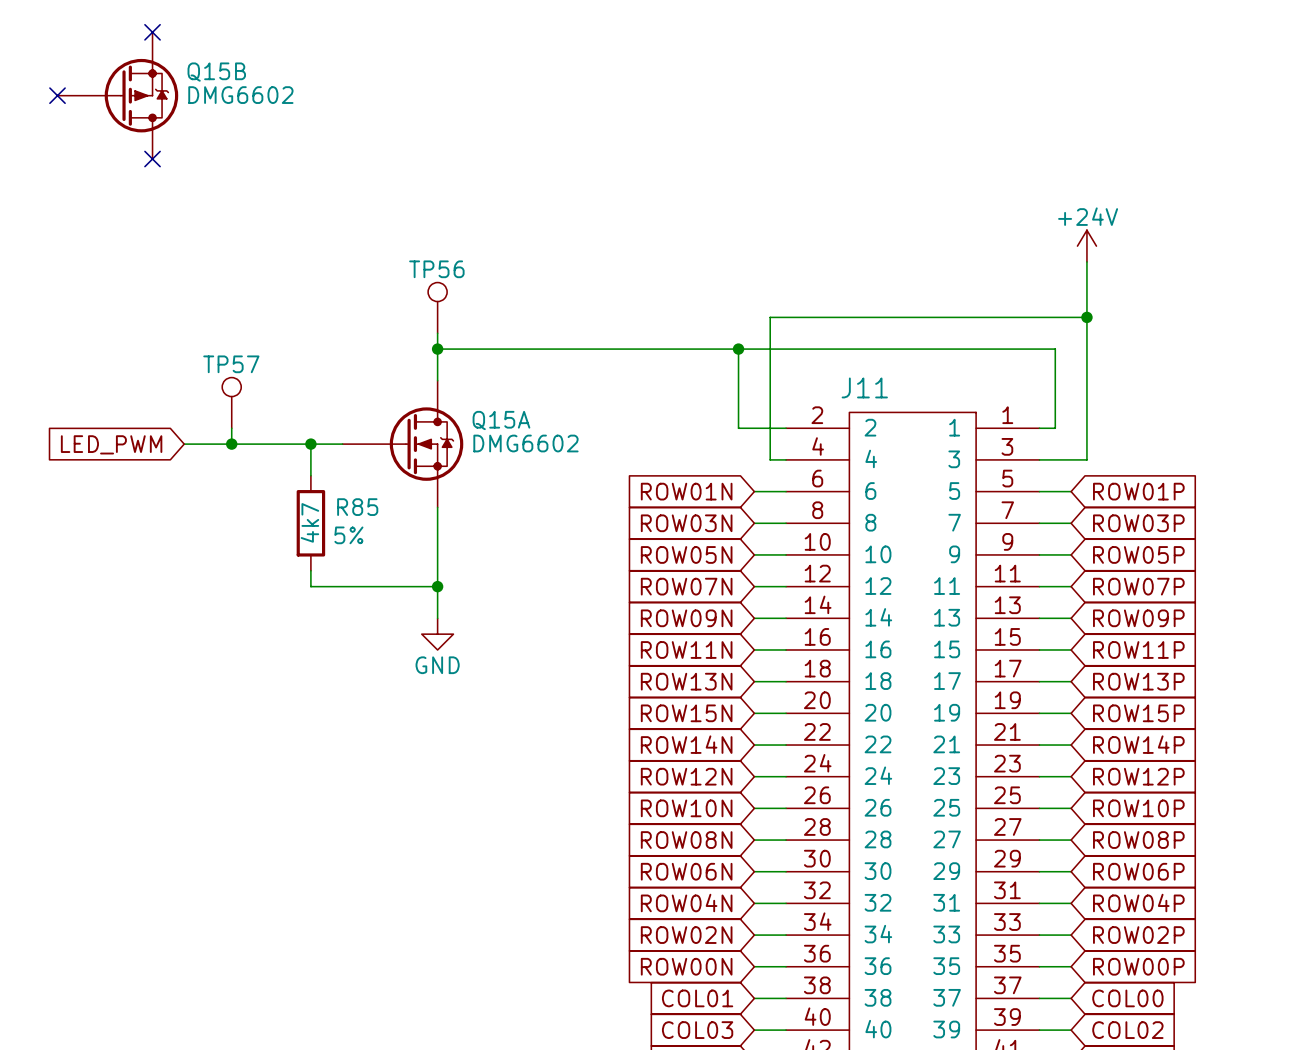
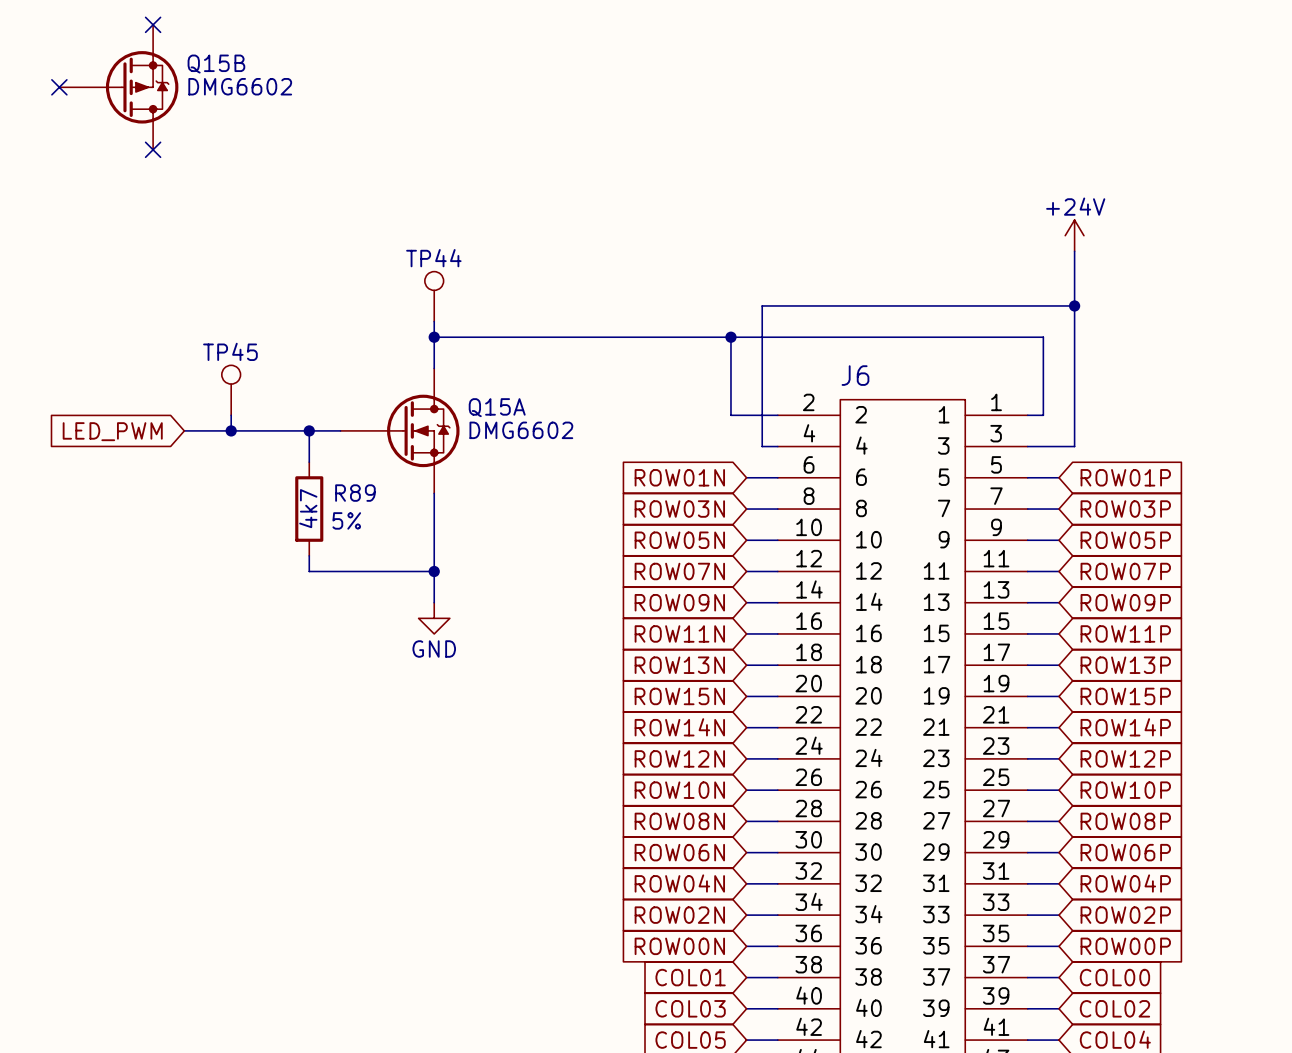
TP56 name: TP56 (436, 269) -> TP44 (433, 258)
TP57 name: TP57 (231, 364) -> TP45 (230, 351)
J11 name: J11 (864, 387) -> J6 (855, 375)
R85 name: R85 (357, 507) -> R89 (355, 493)

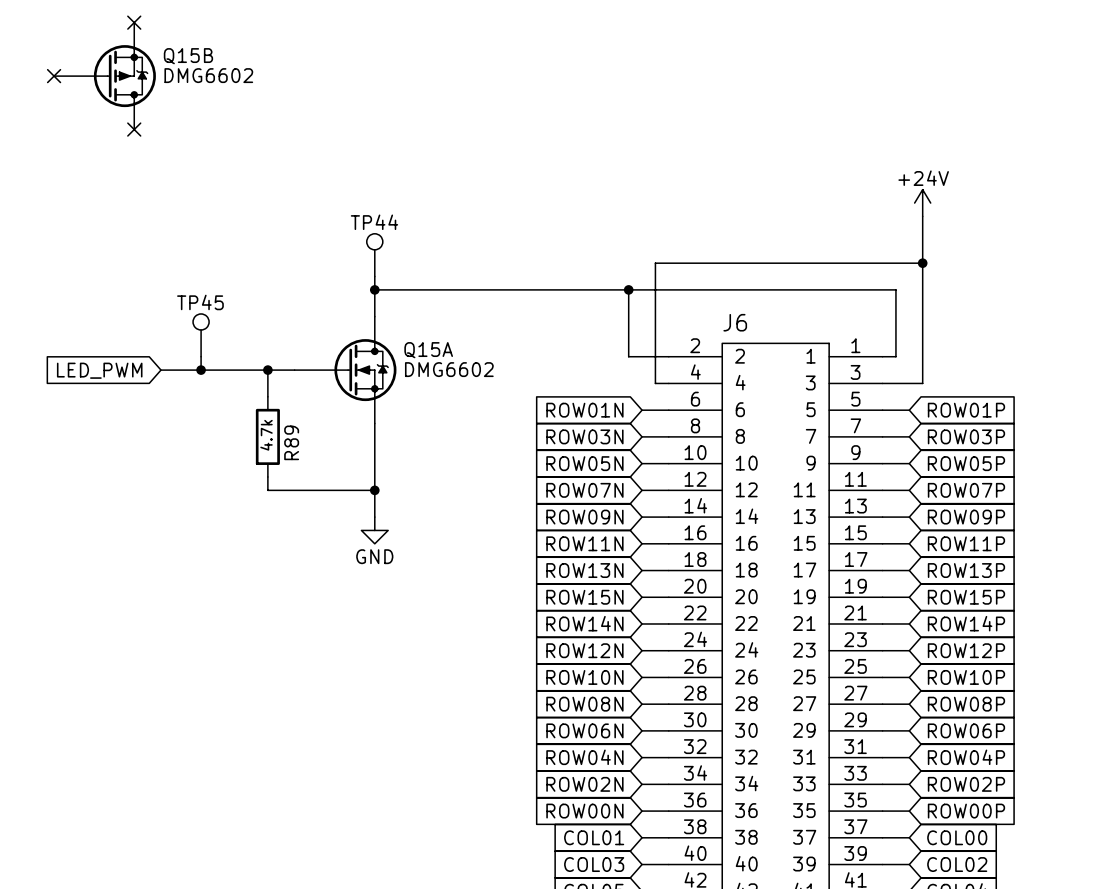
R89 name rotation: 0° (355, 493) -> 90° counterclockwise (291, 442)
R89 text: none -> 4.7k (266, 435)
R89 text: 4k7 (308, 508) -> none
R89 text: 5% (346, 520) -> none

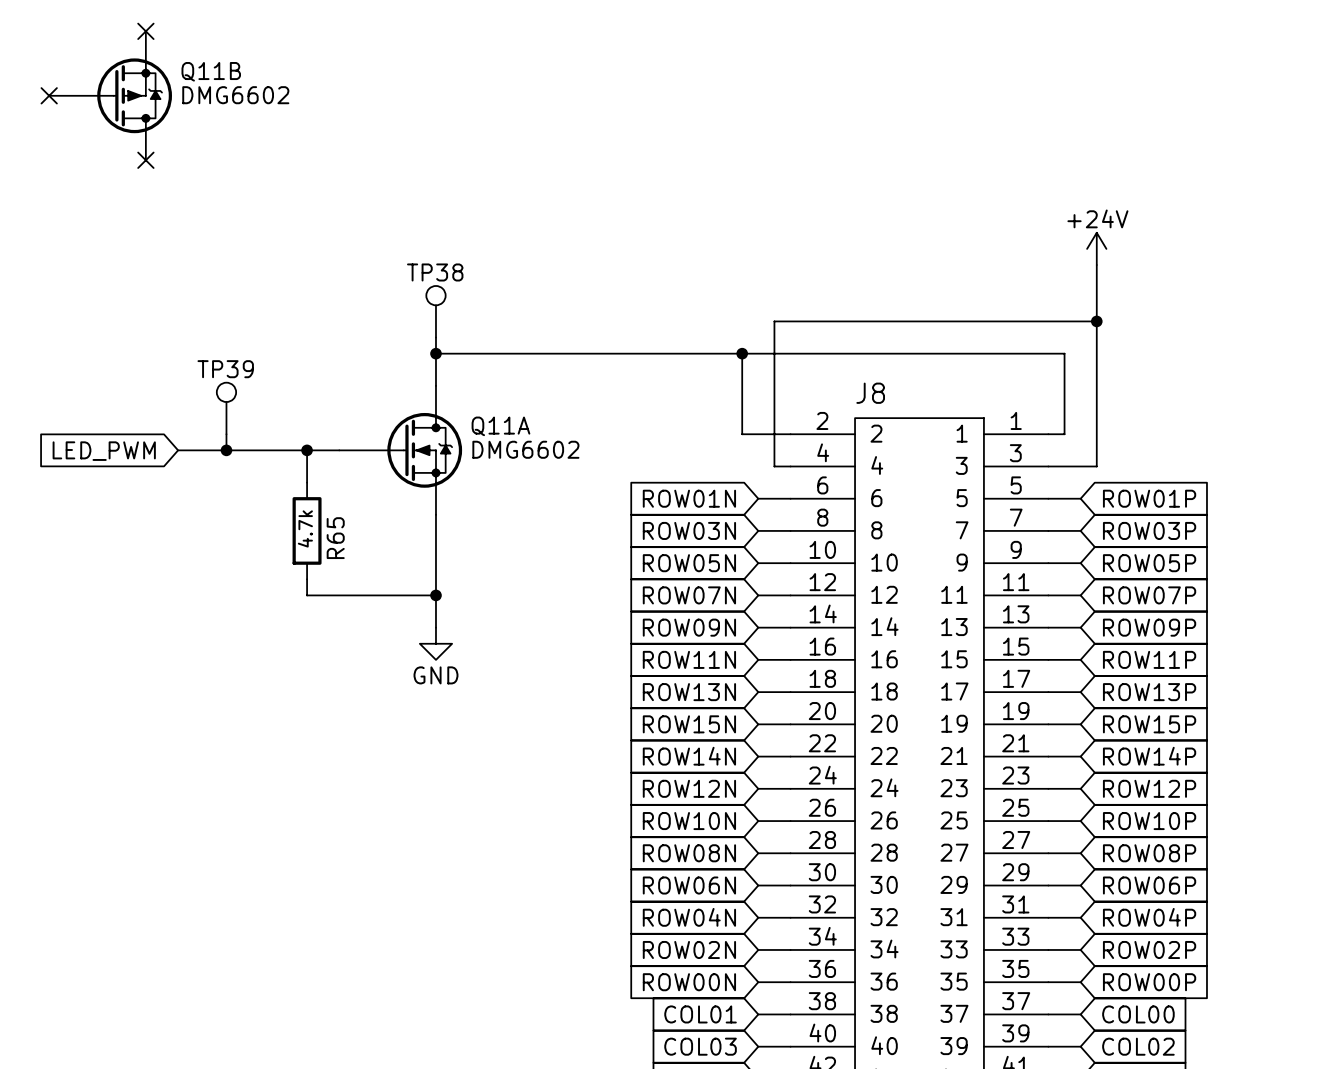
Q15B name: Q15B (188, 56) -> Q11B (211, 71)
TP44 name: TP44 (374, 222) -> TP38 (435, 272)
TP45 name: TP45 (200, 302) -> TP39 (225, 369)
J6 name: J6 (735, 322) -> J8 (870, 393)
Q15A name: Q15A (428, 350) -> Q11A (500, 426)
R89 name: R89 (291, 442) -> R65 (335, 538)

